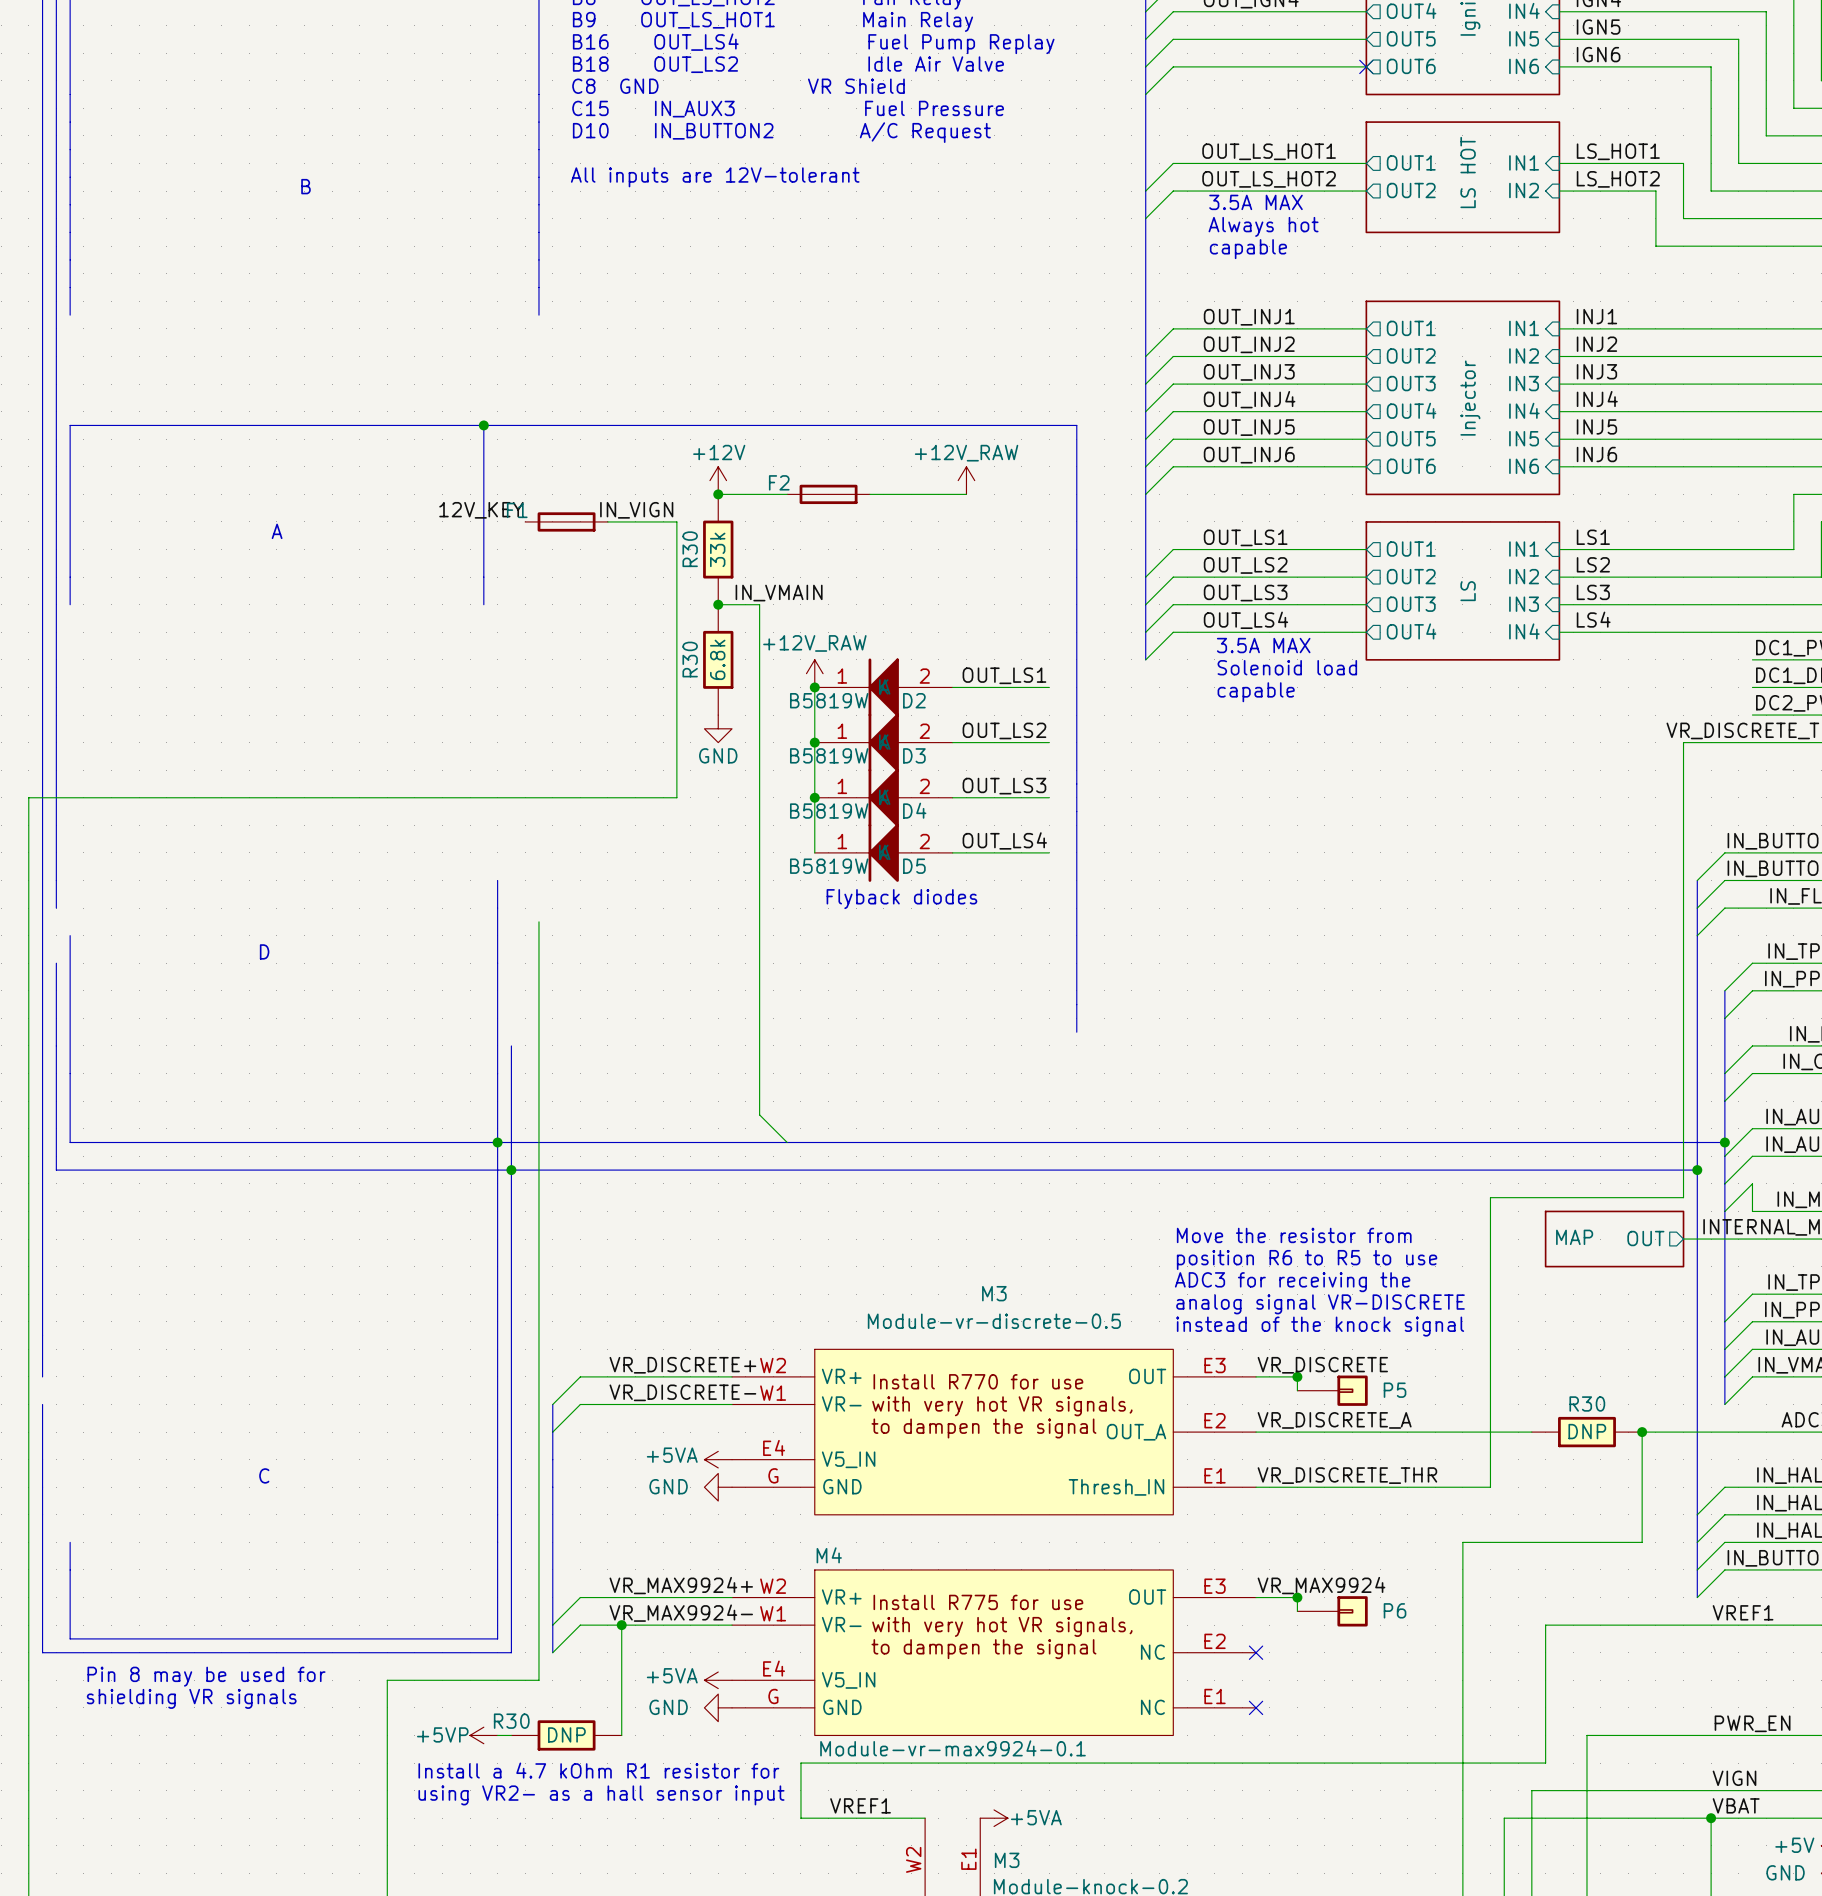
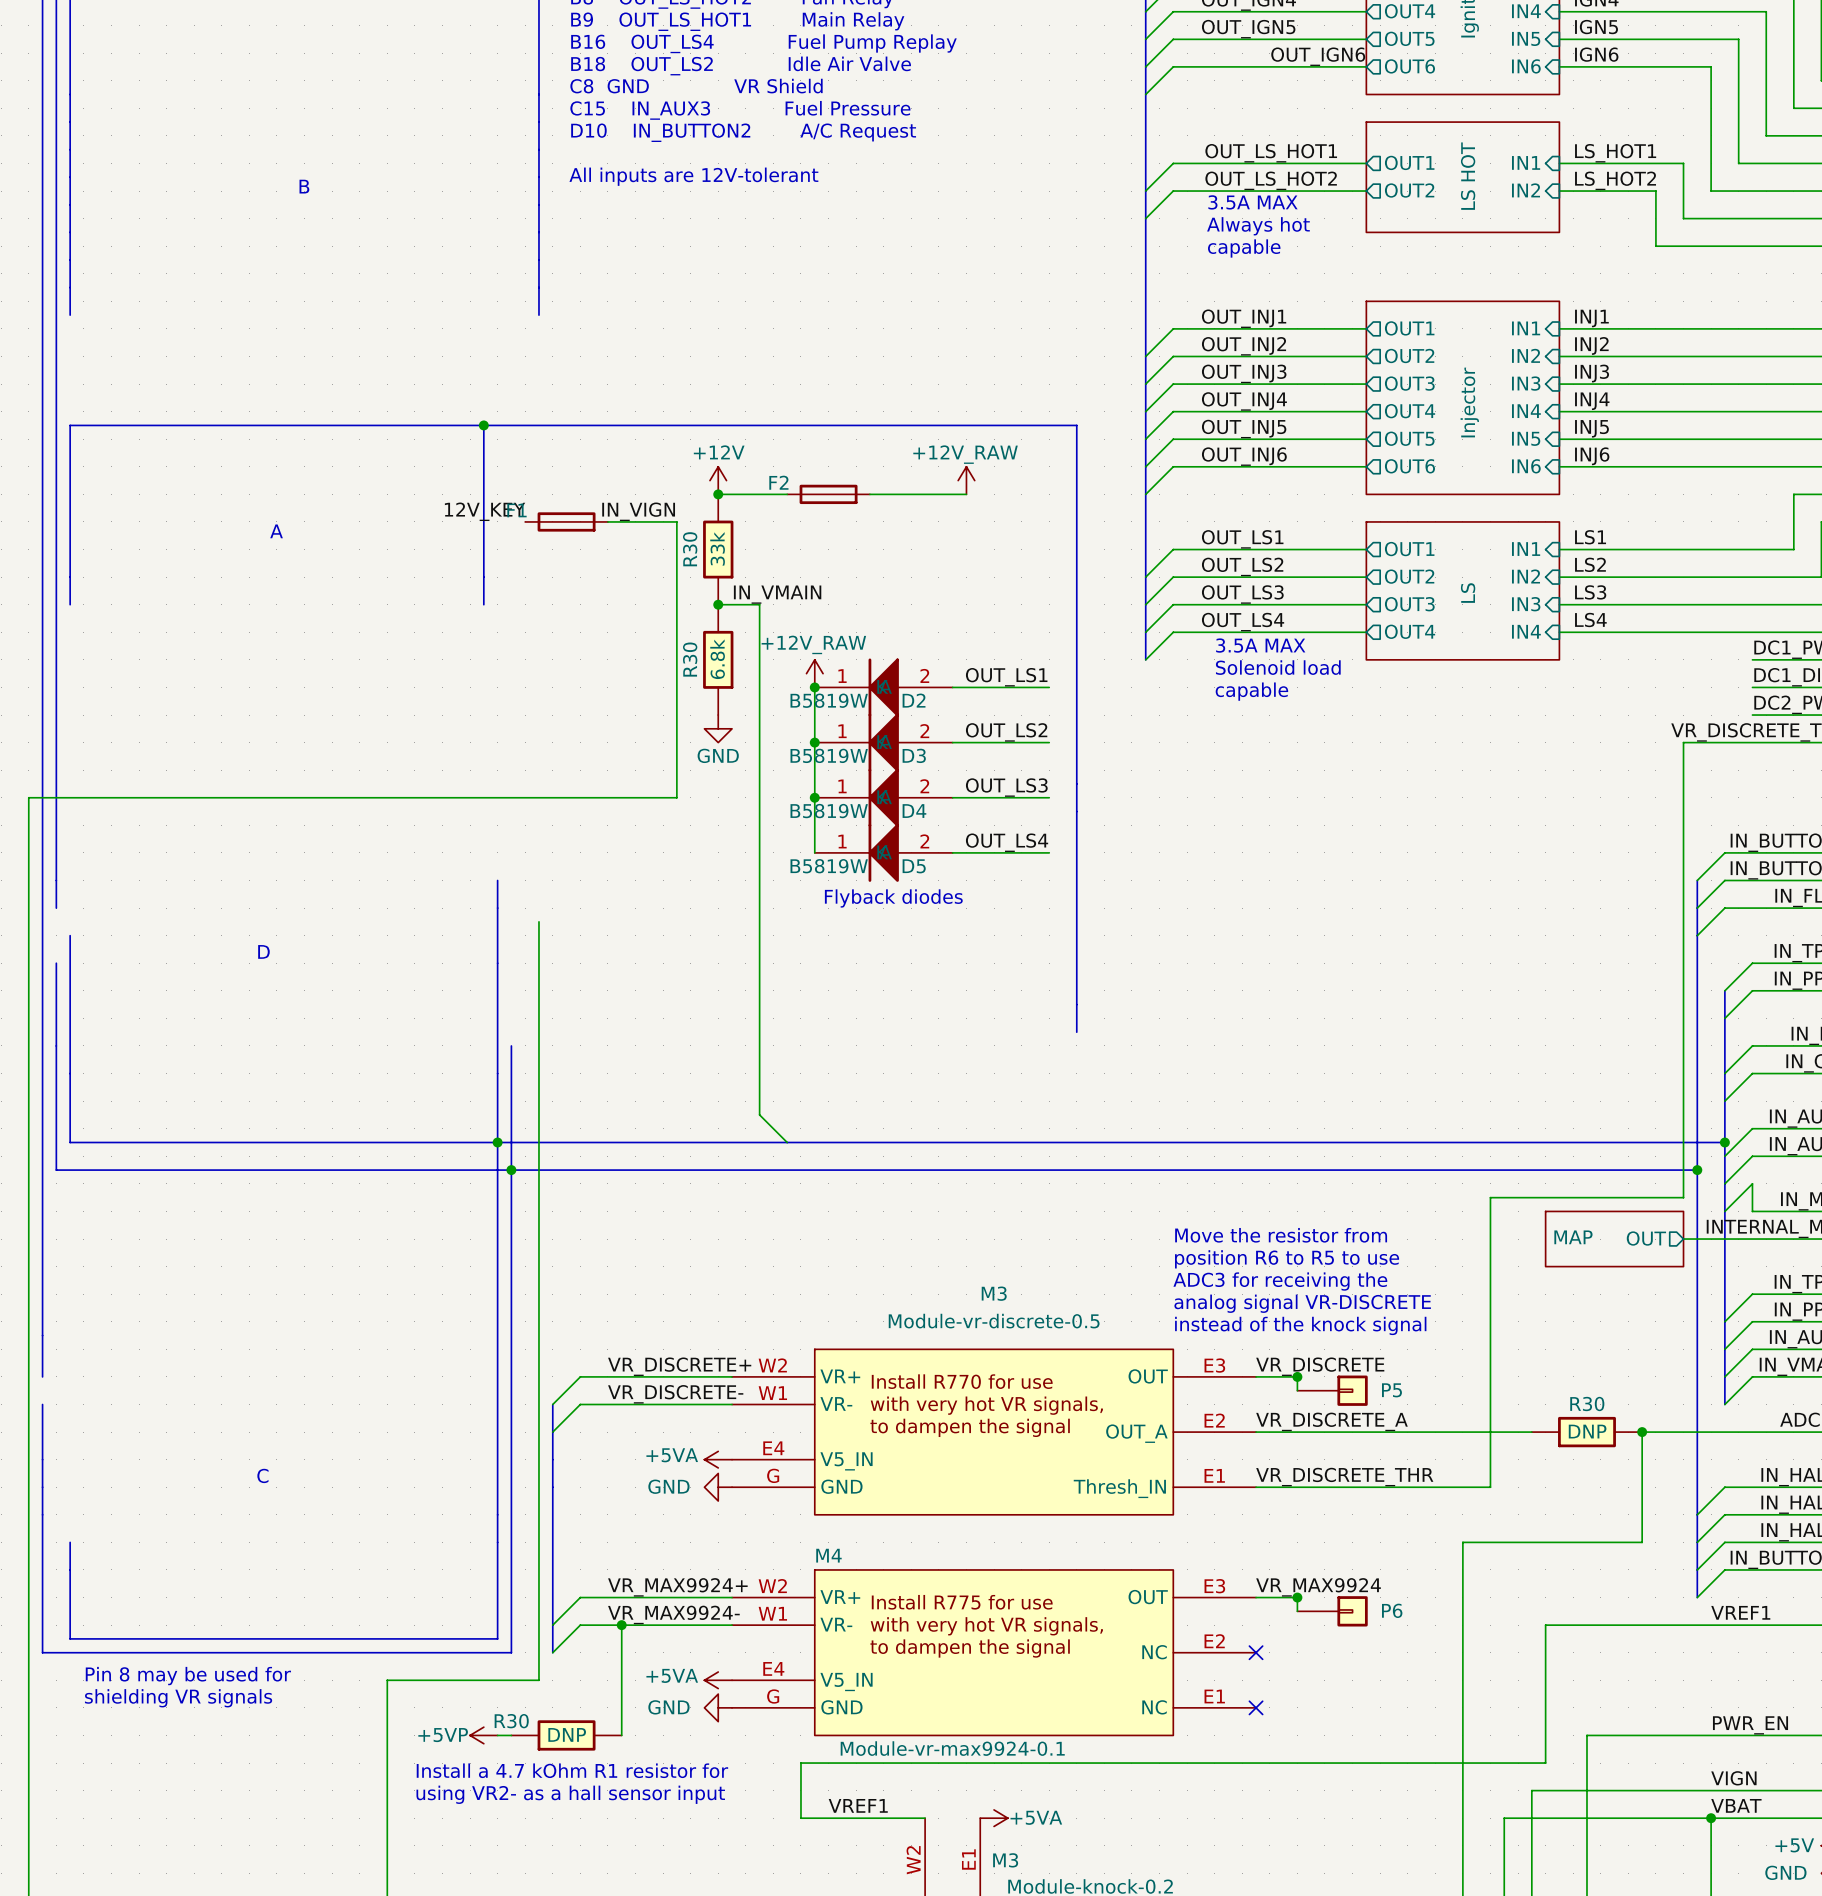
label: none -> OUT_IGN5 (1248, 29)
label: none -> OUT_IGN6 (1318, 56)
no-connect mark: (1366, 66) -> none

